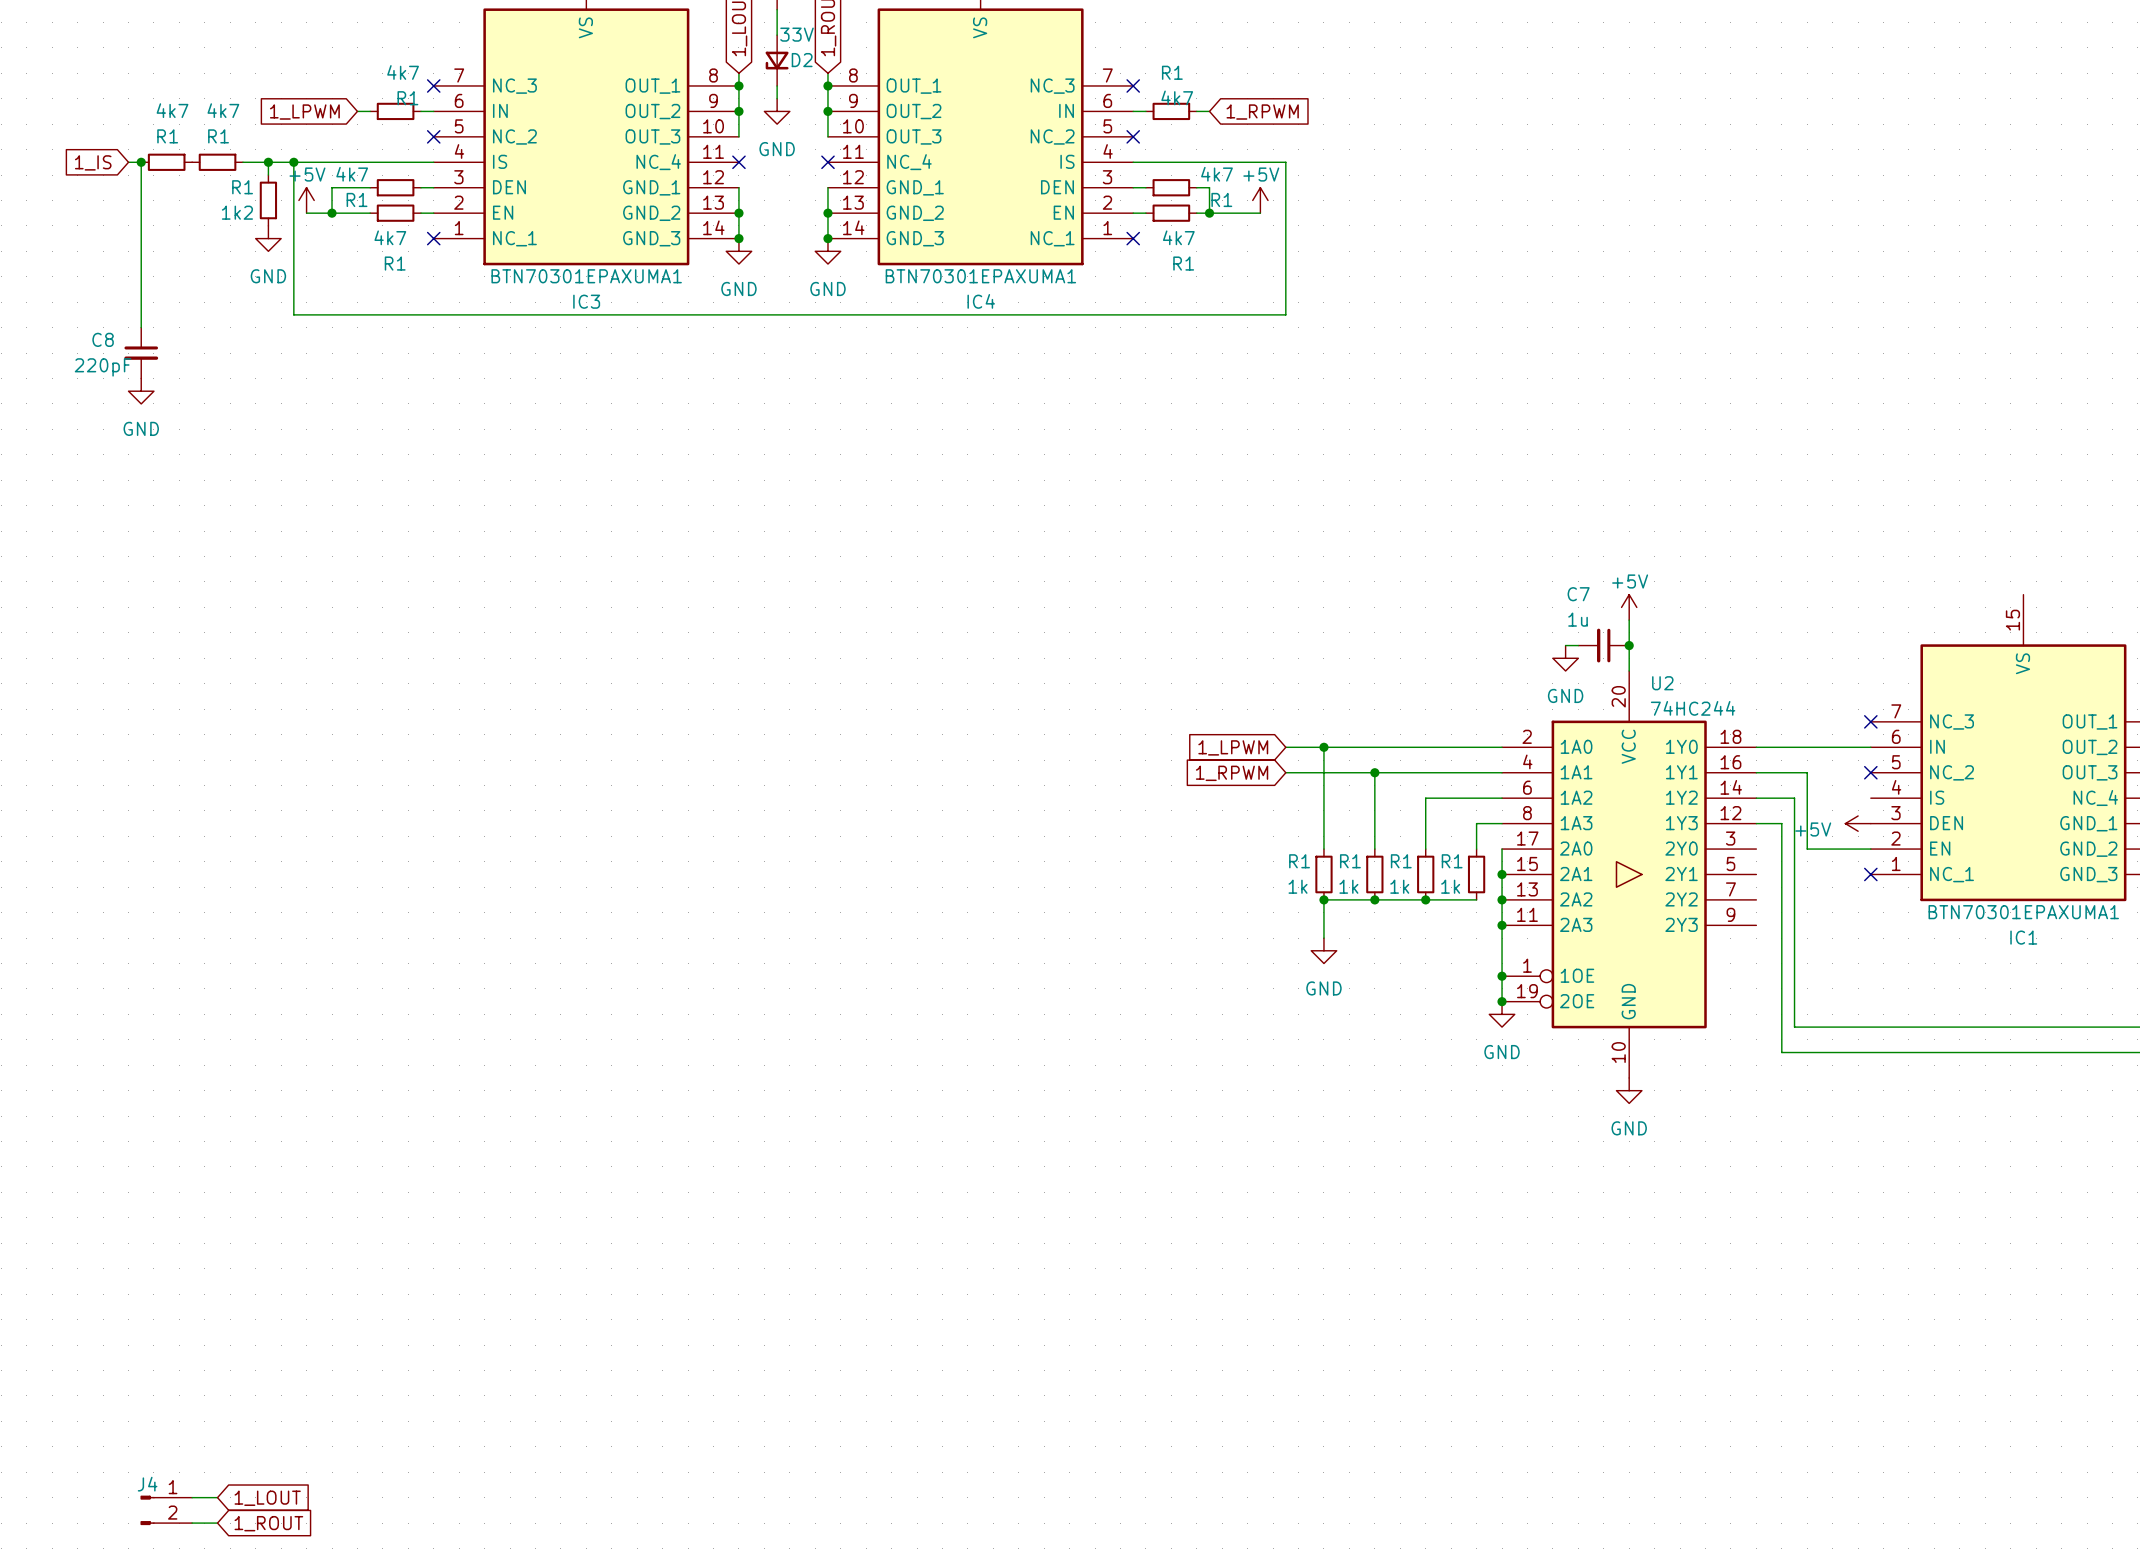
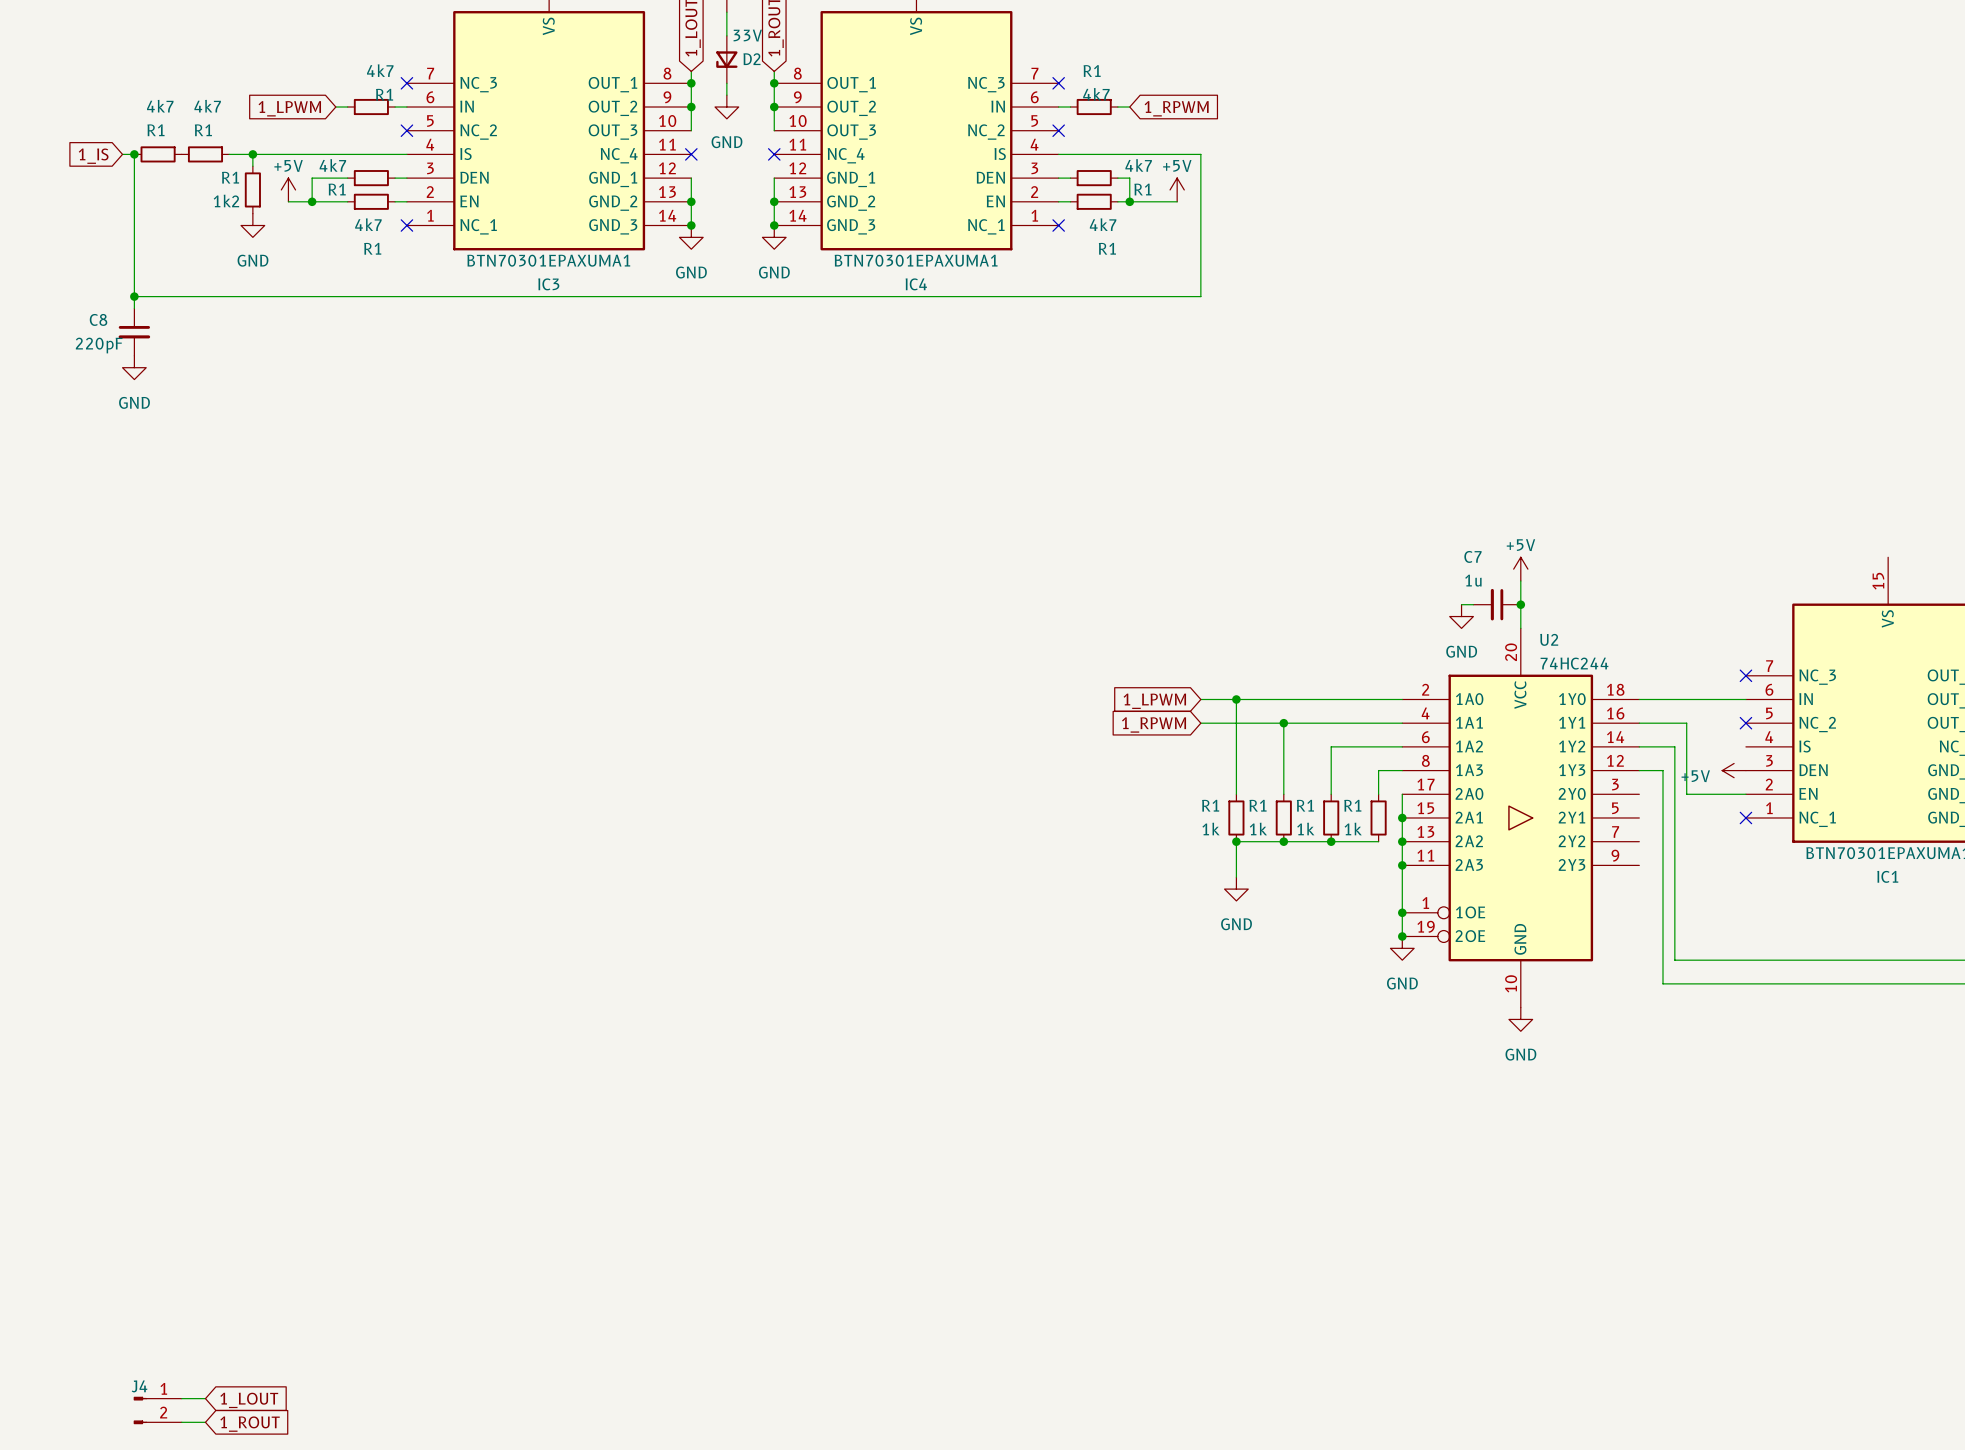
wire: (293, 162) (293, 314) -> (134, 296) (276, 296)
junction: (293, 162) -> none
junction: none -> (134, 296)

